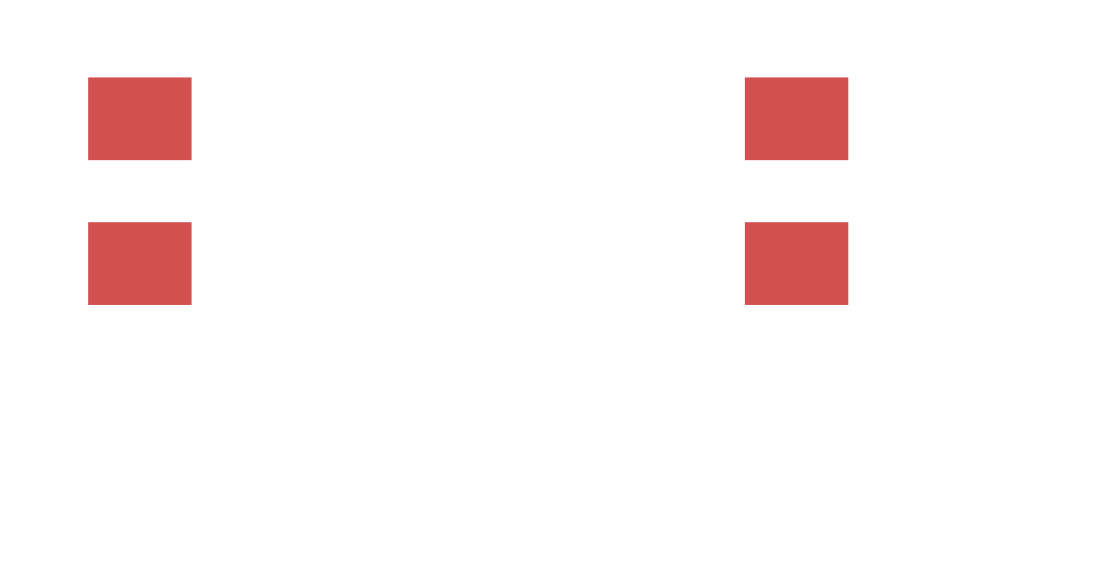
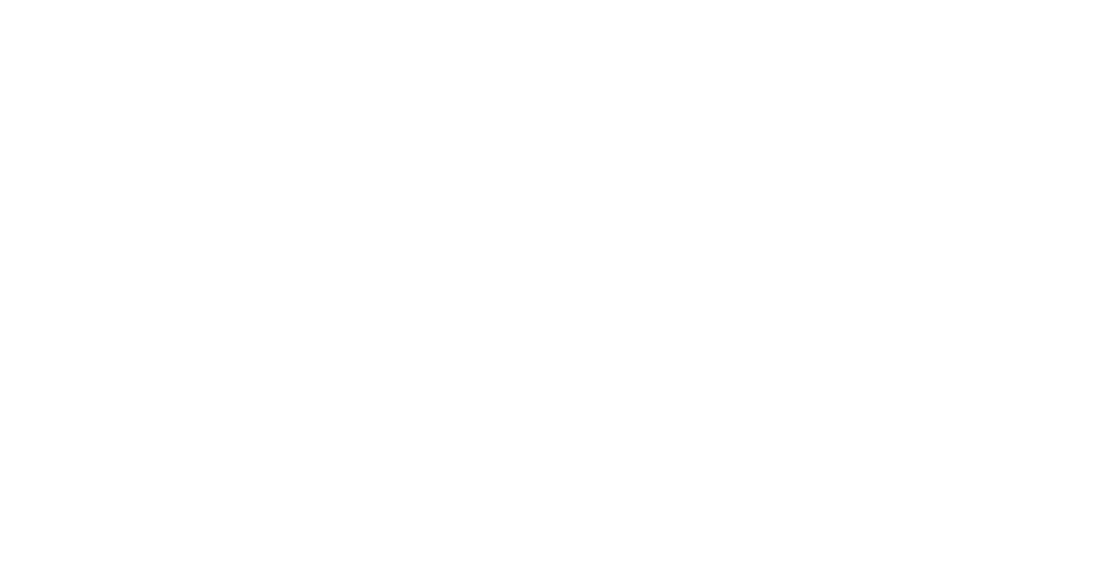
part: (139, 191) -> none
part: (796, 191) -> none

